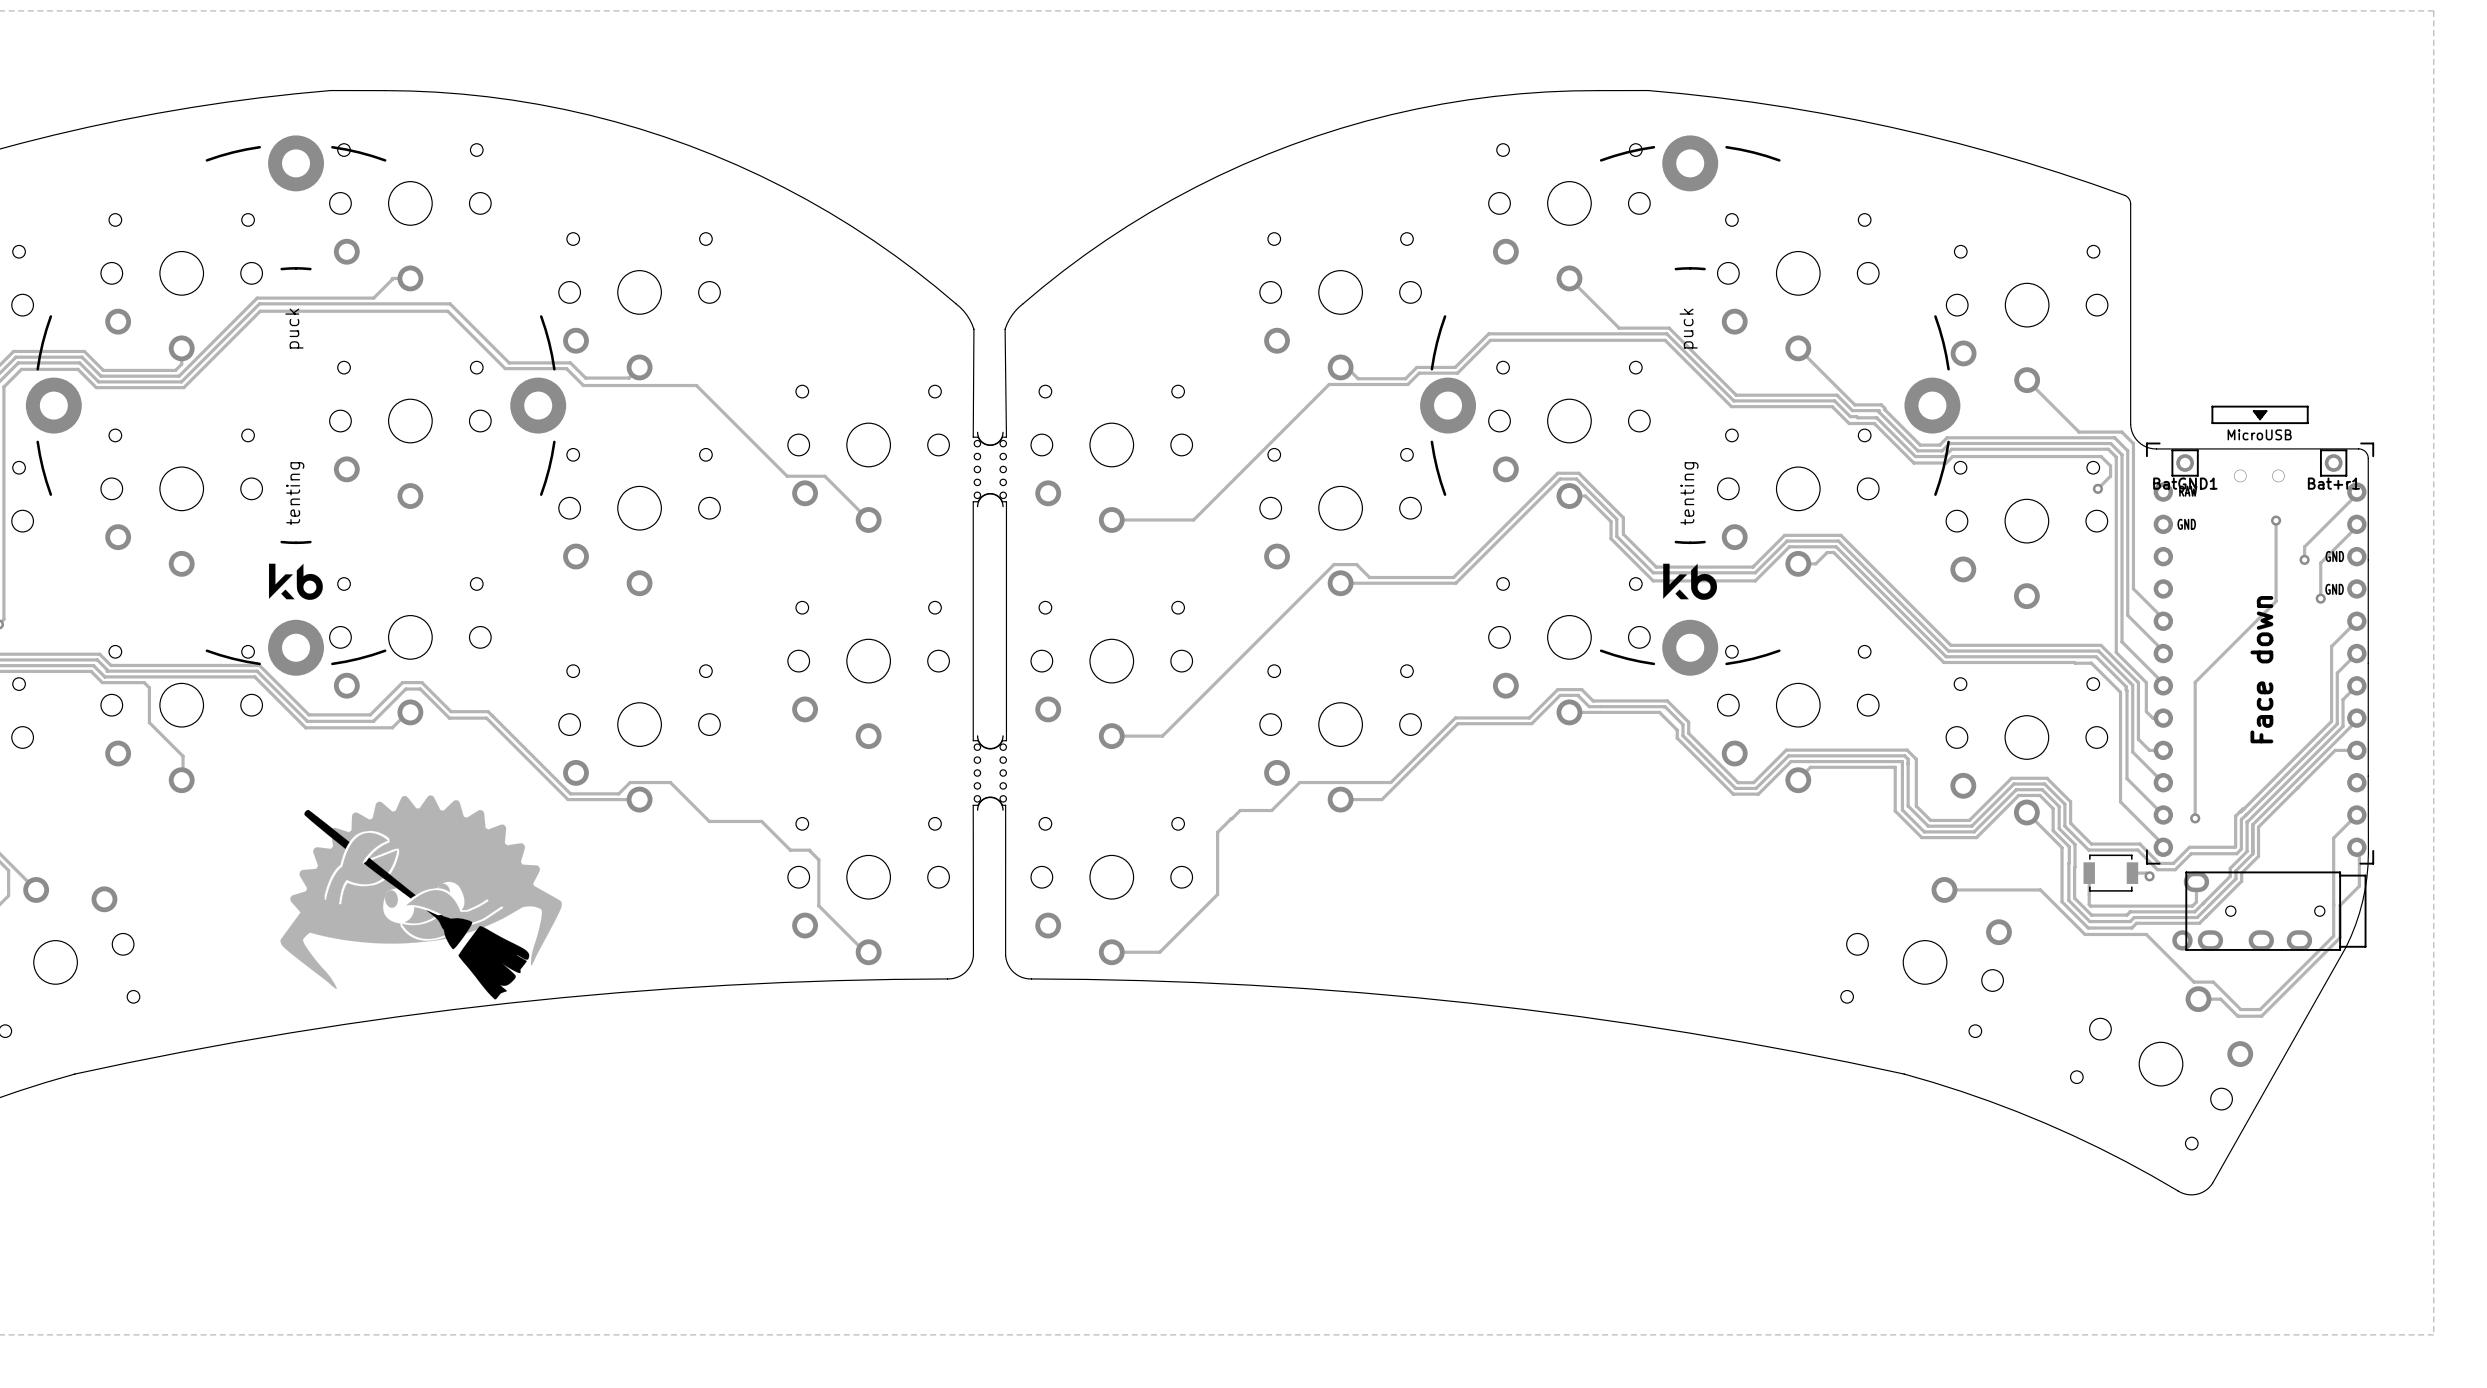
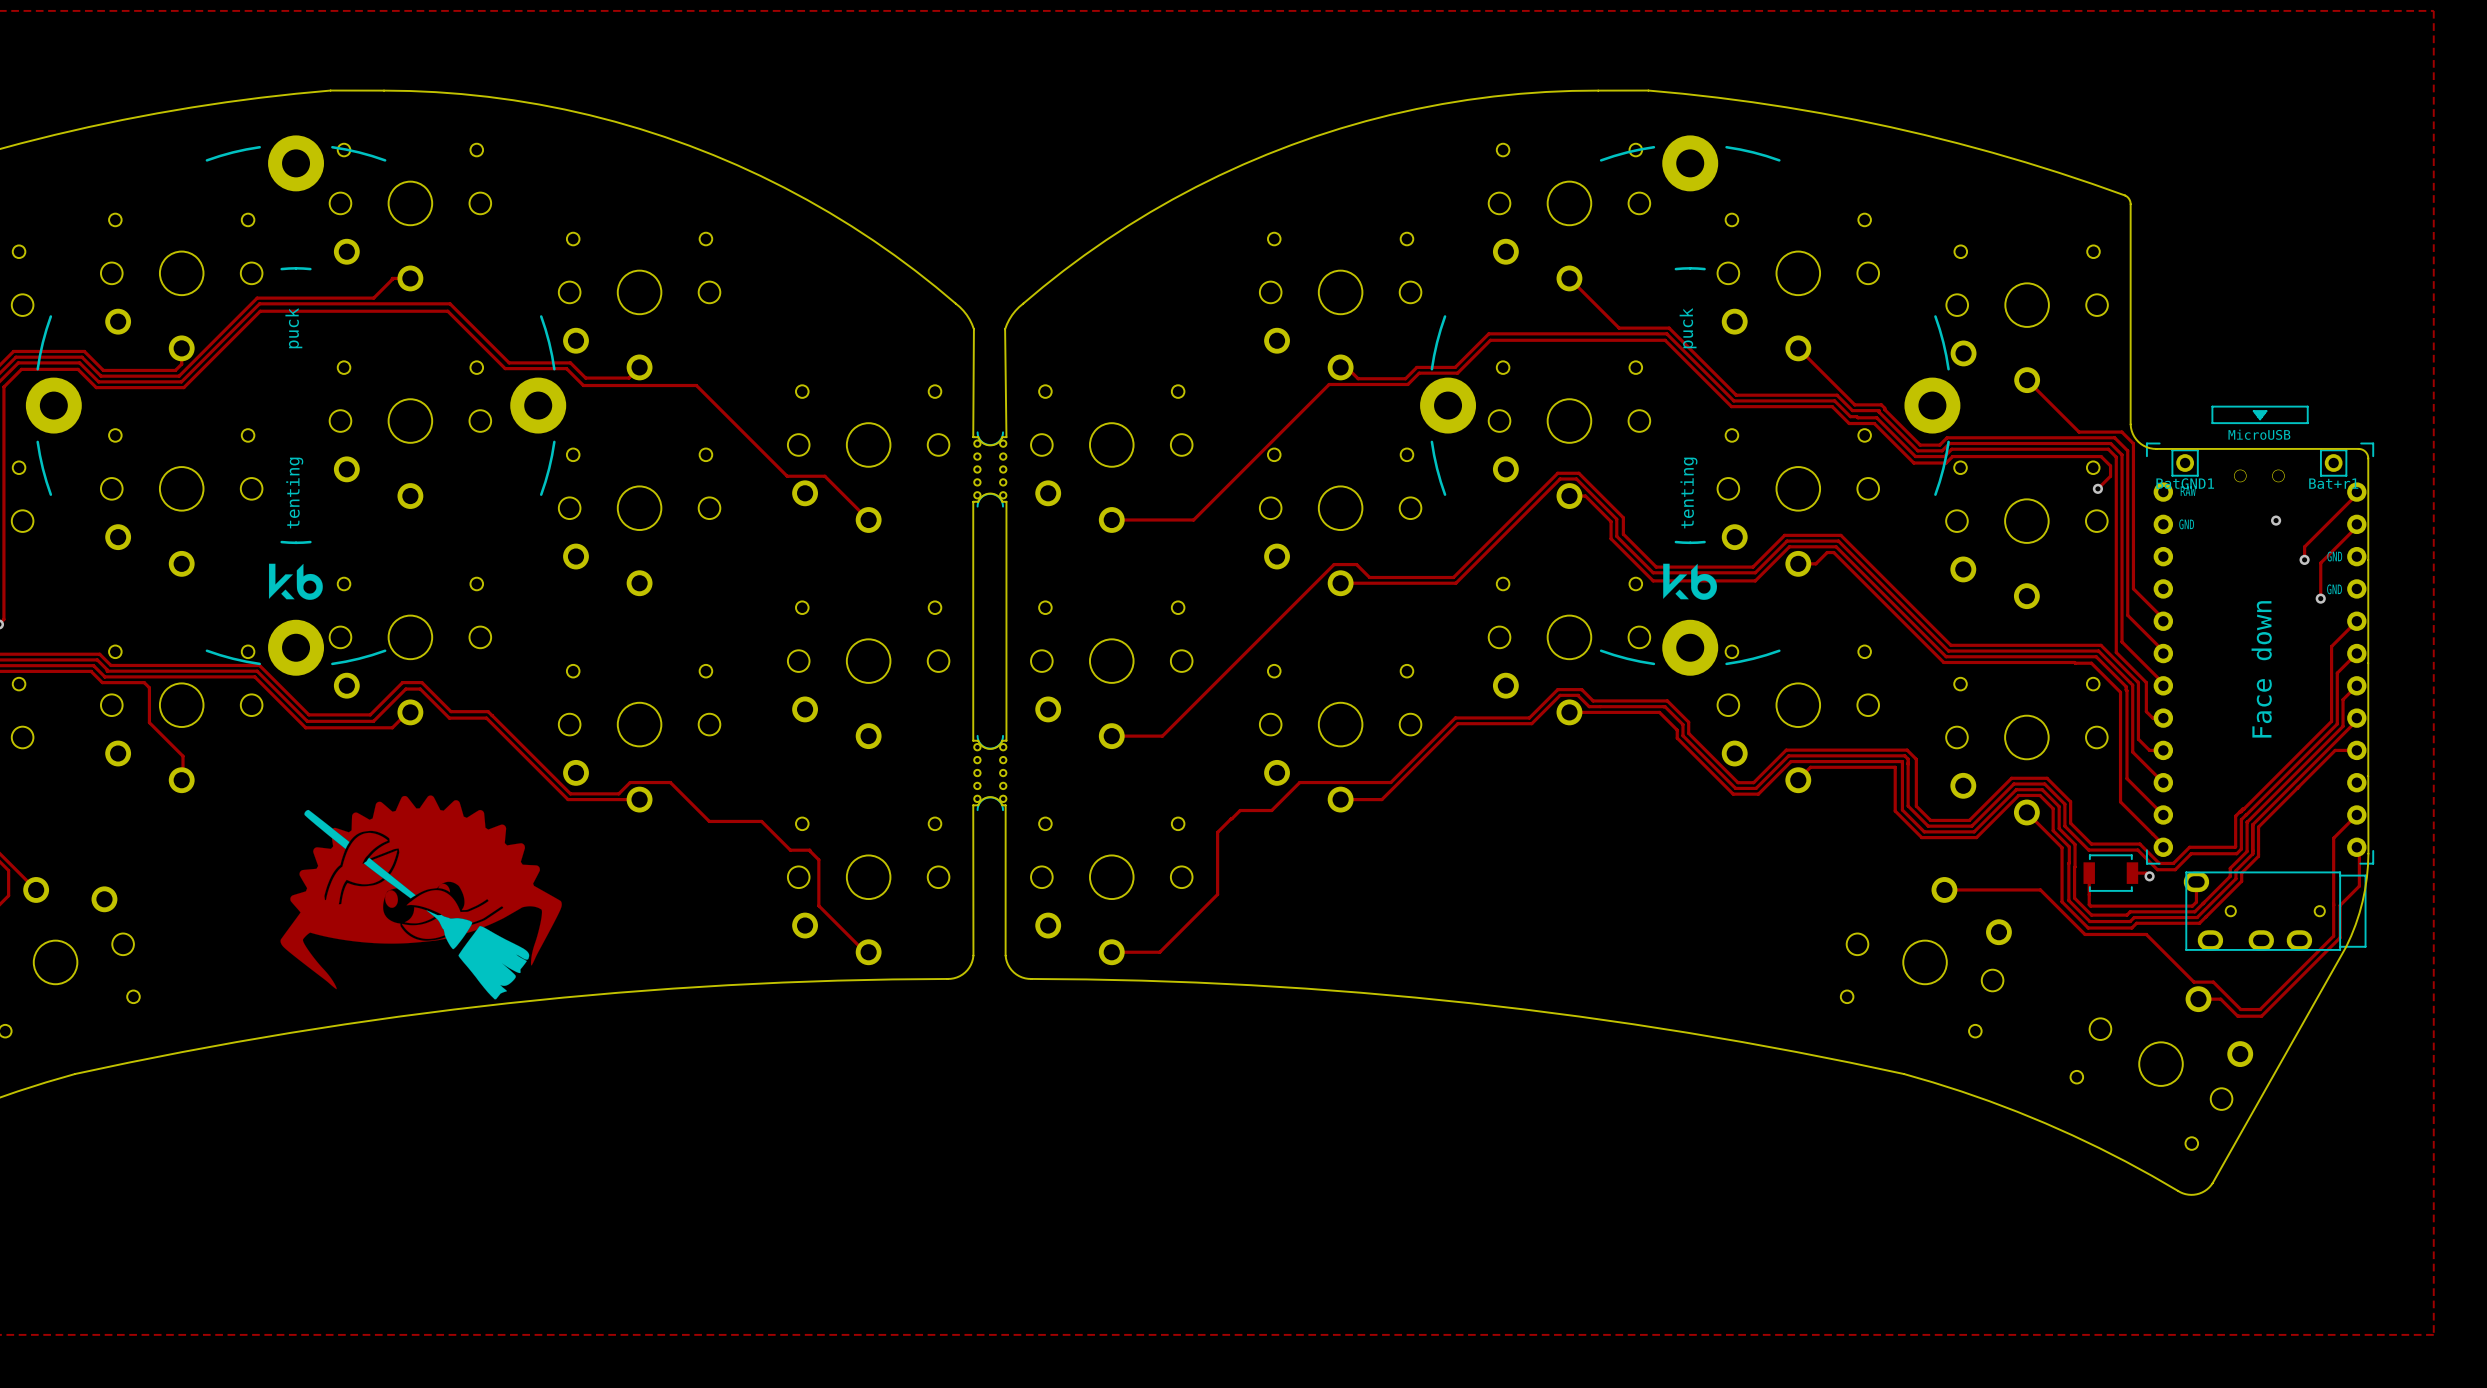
track: (2276, 520) (2276, 601) (2195, 682) (2195, 818) -> none
via: (2195, 818) -> none
part: (2182, 940) -> none

